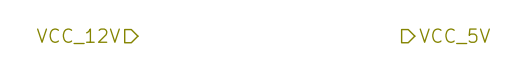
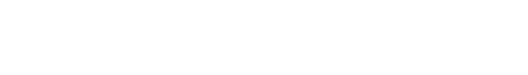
hierarchical label: VCC_12V (78, 36) -> none
hierarchical label: VCC_5V (454, 36) -> none

